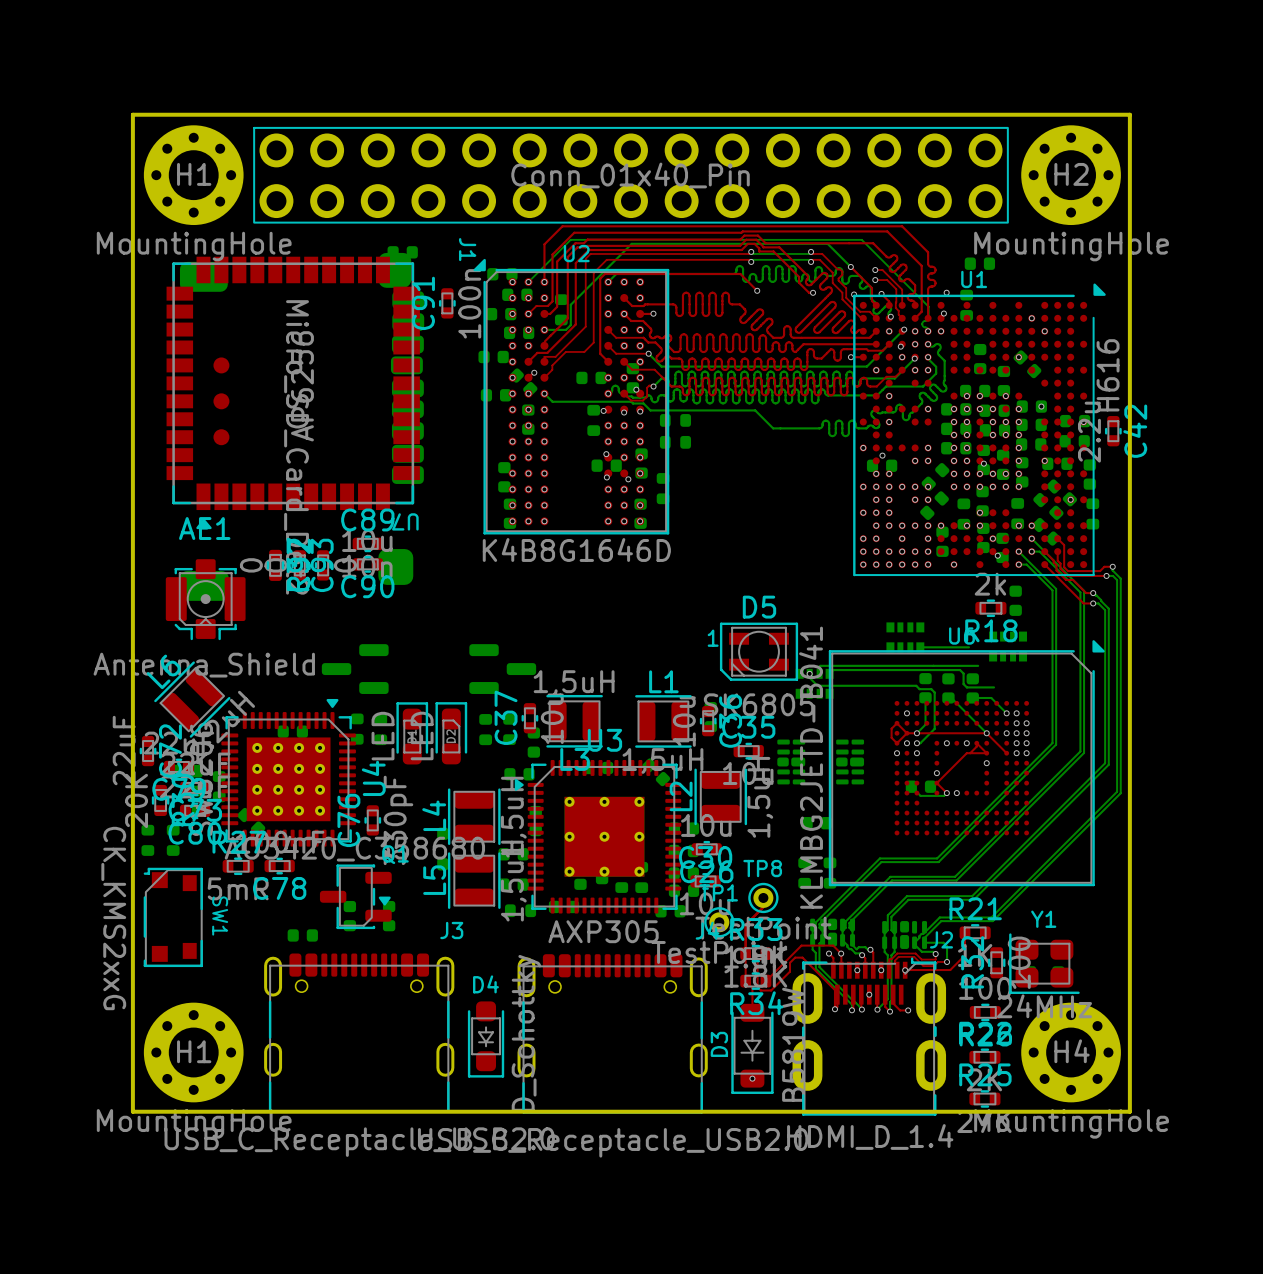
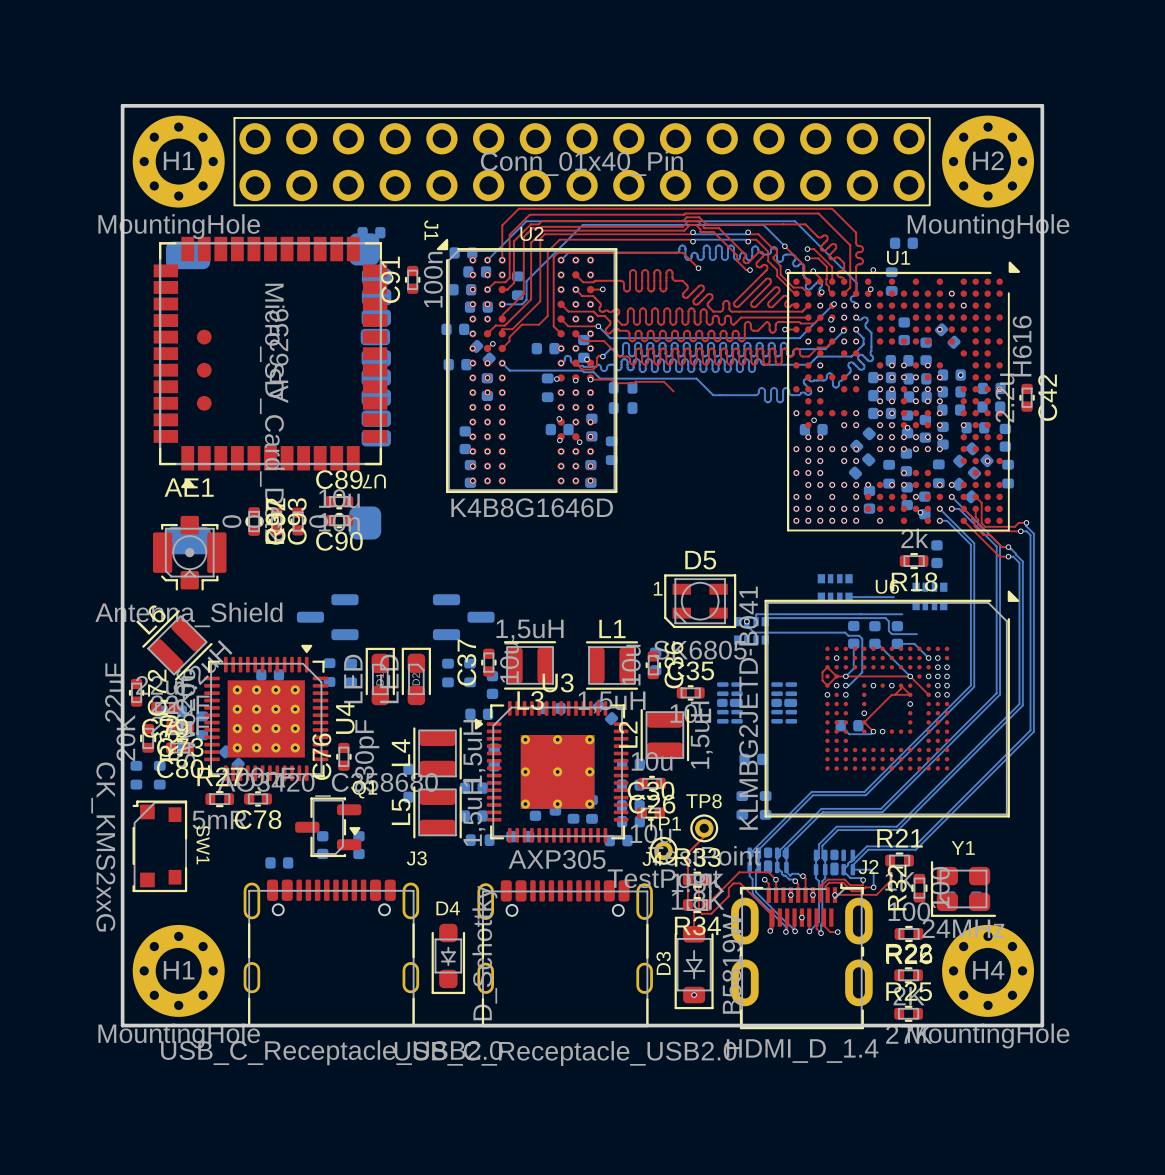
top track: none -> (590, 379) (611, 379) (614, 383) (634, 383) (635, 381)
top track: none -> (635, 381) (664, 381) (673, 391)

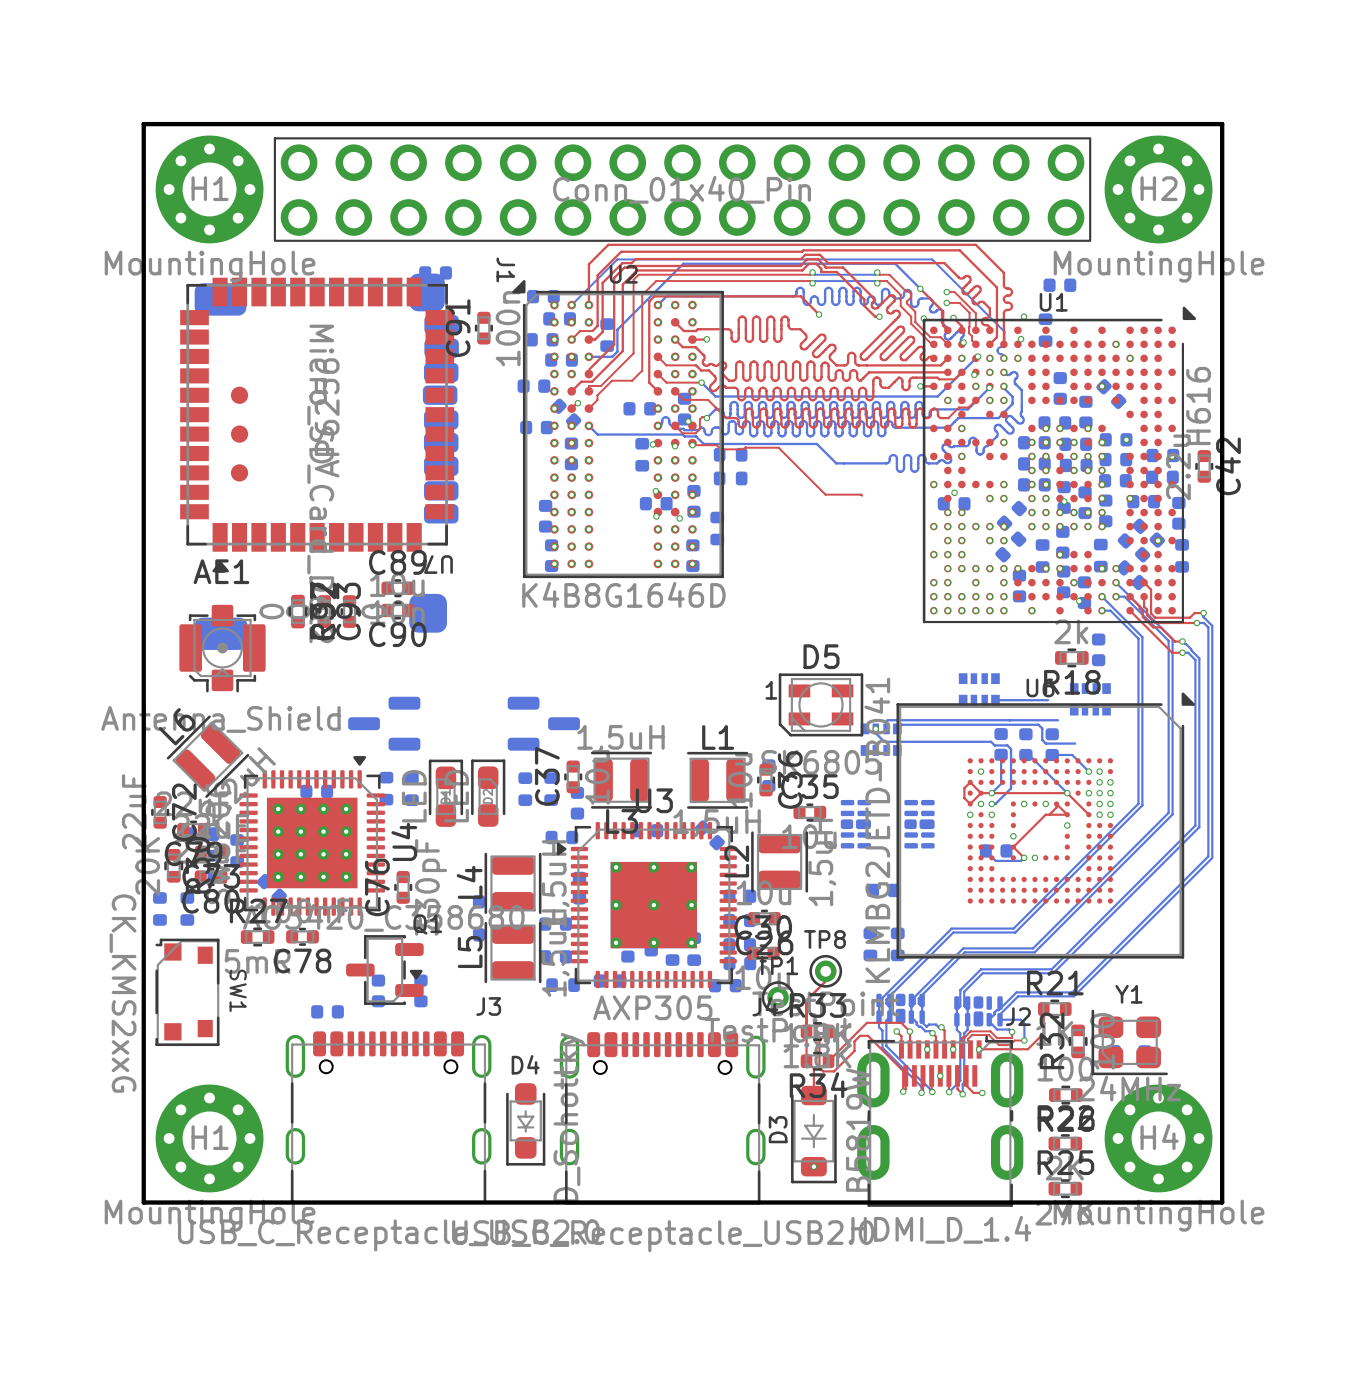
top track: none -> (789, 459) (825, 494) (862, 495)

